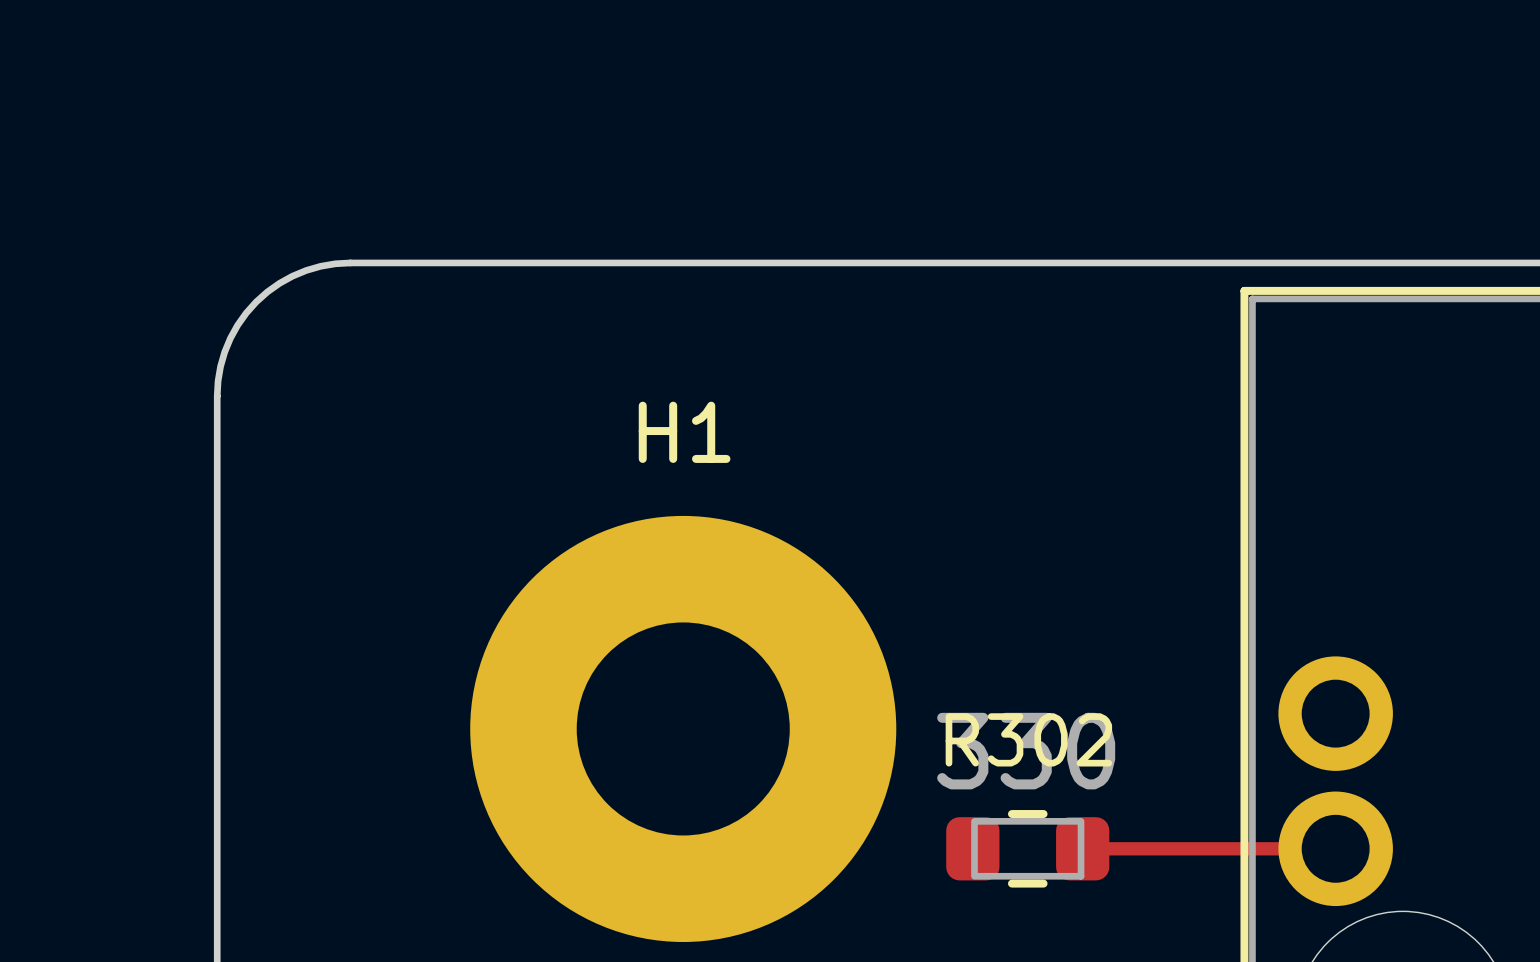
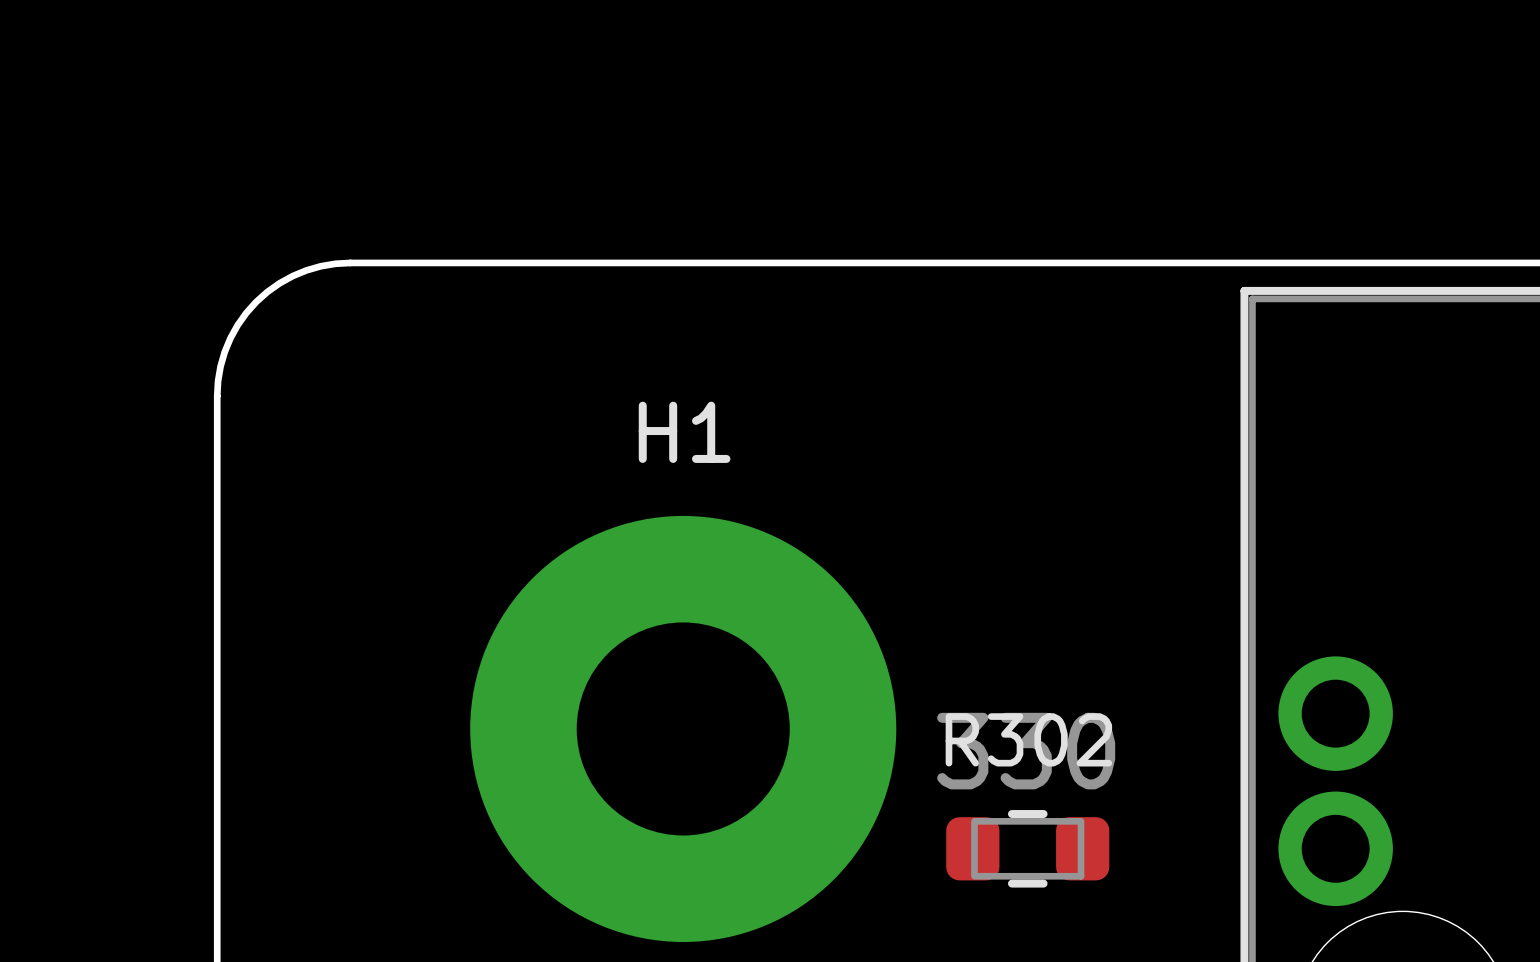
top track: (1082, 848) (1335, 848) -> none

